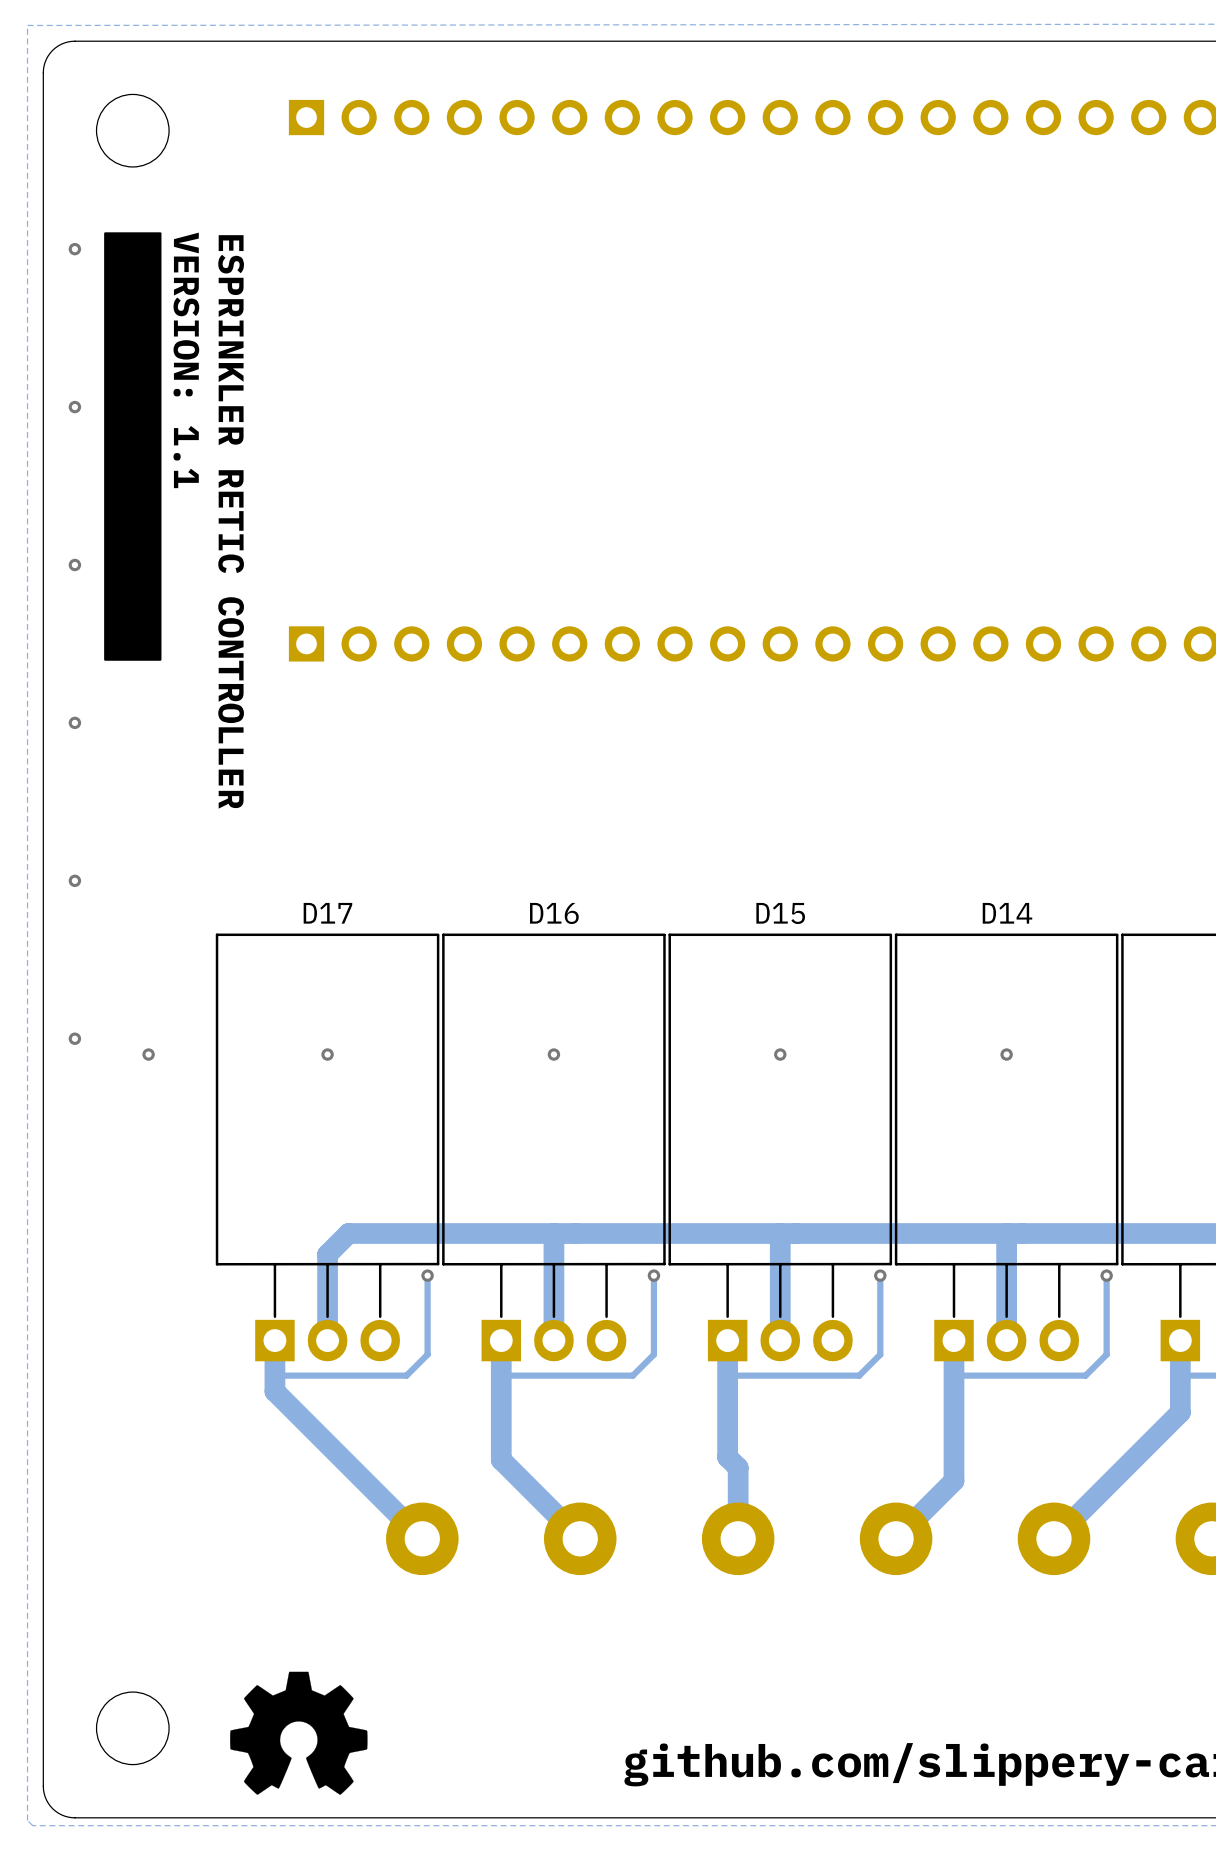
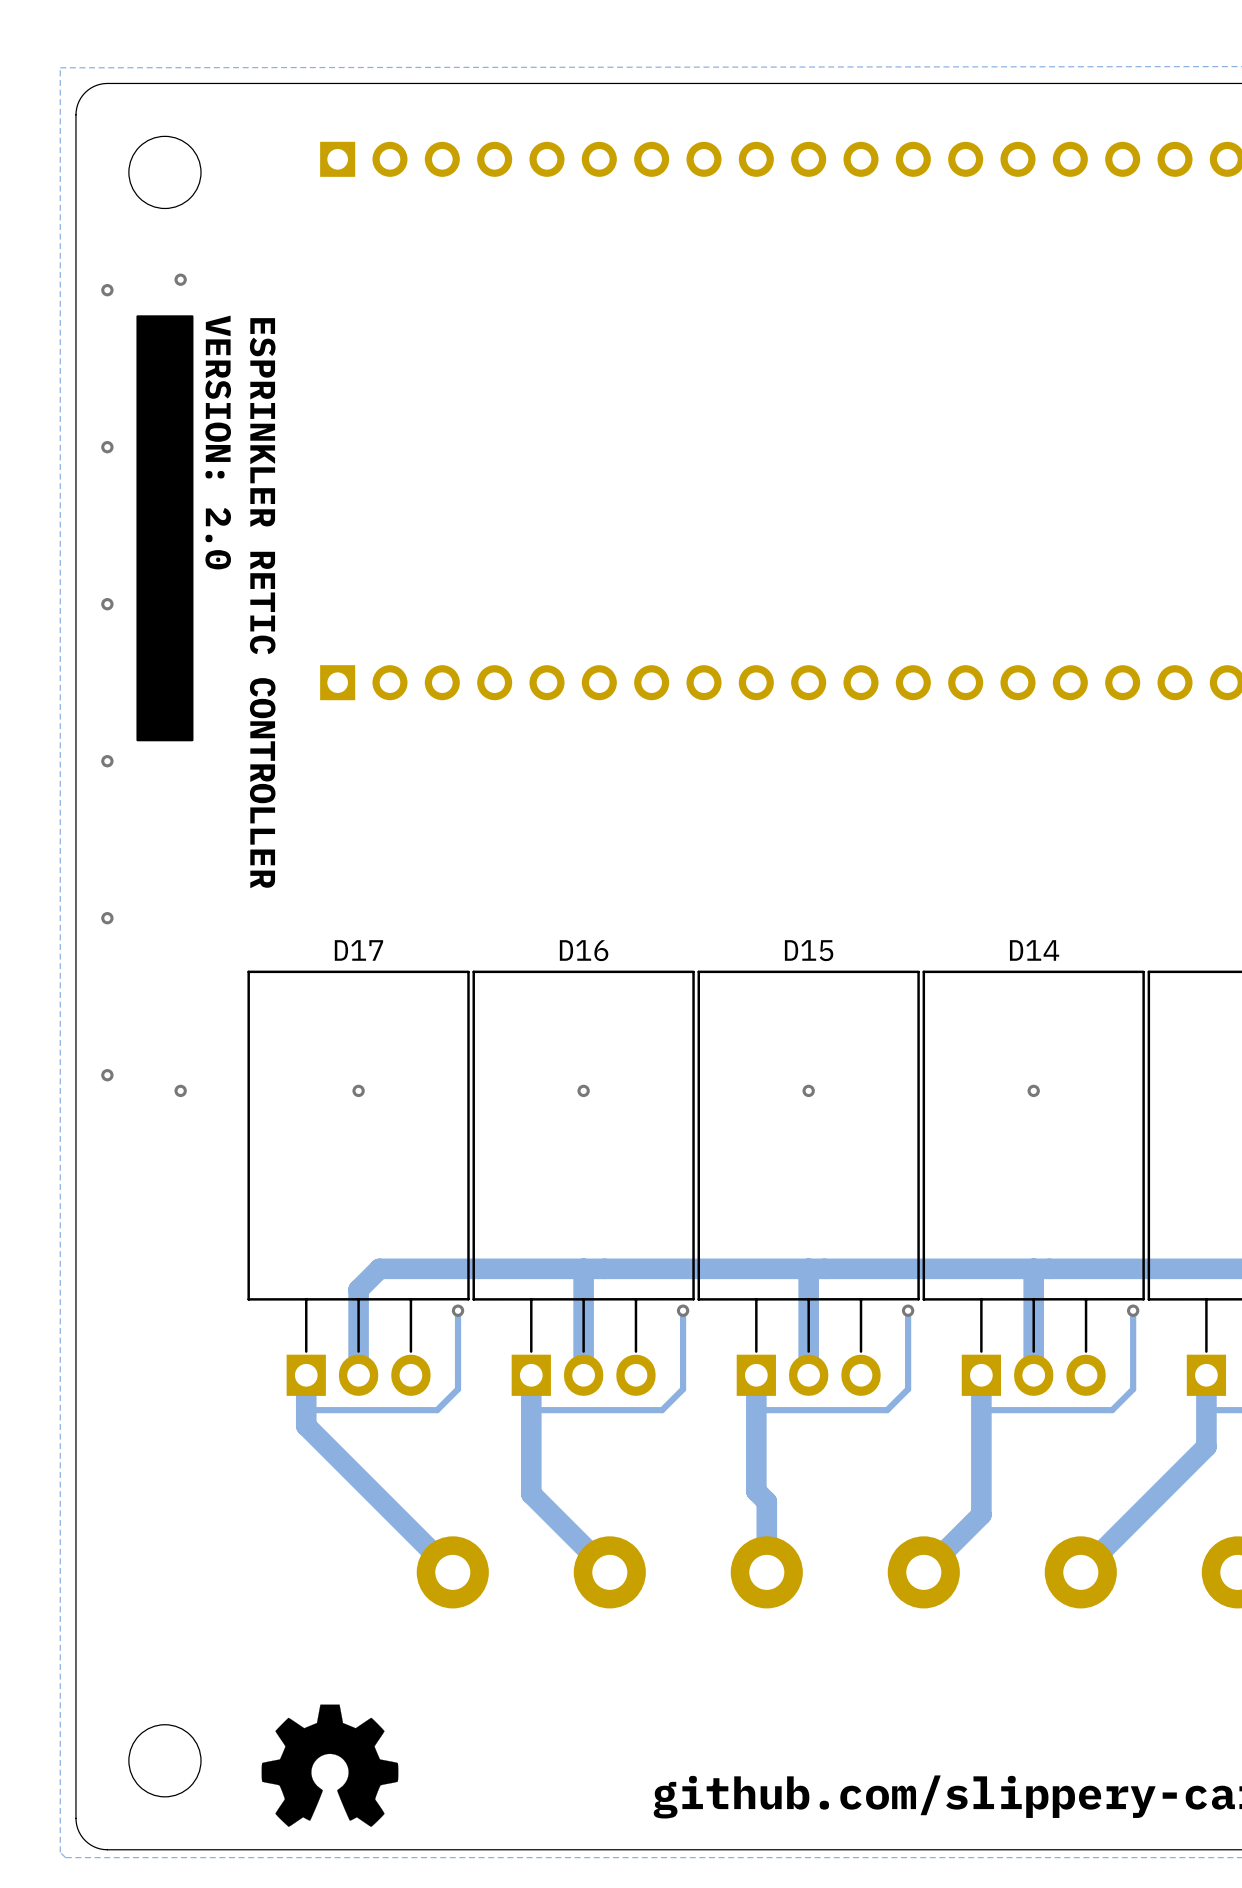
via: none -> (180, 279)
text: VERSION: 1.1 (186, 360) -> VERSION: 2.0 (218, 442)
drawing position: (132, 446) -> (164, 528)
text position: ESPRINKLER RETIC CONTROLLER (231, 521) -> ESPRINKLER RETIC CONTROLLER (262, 603)

